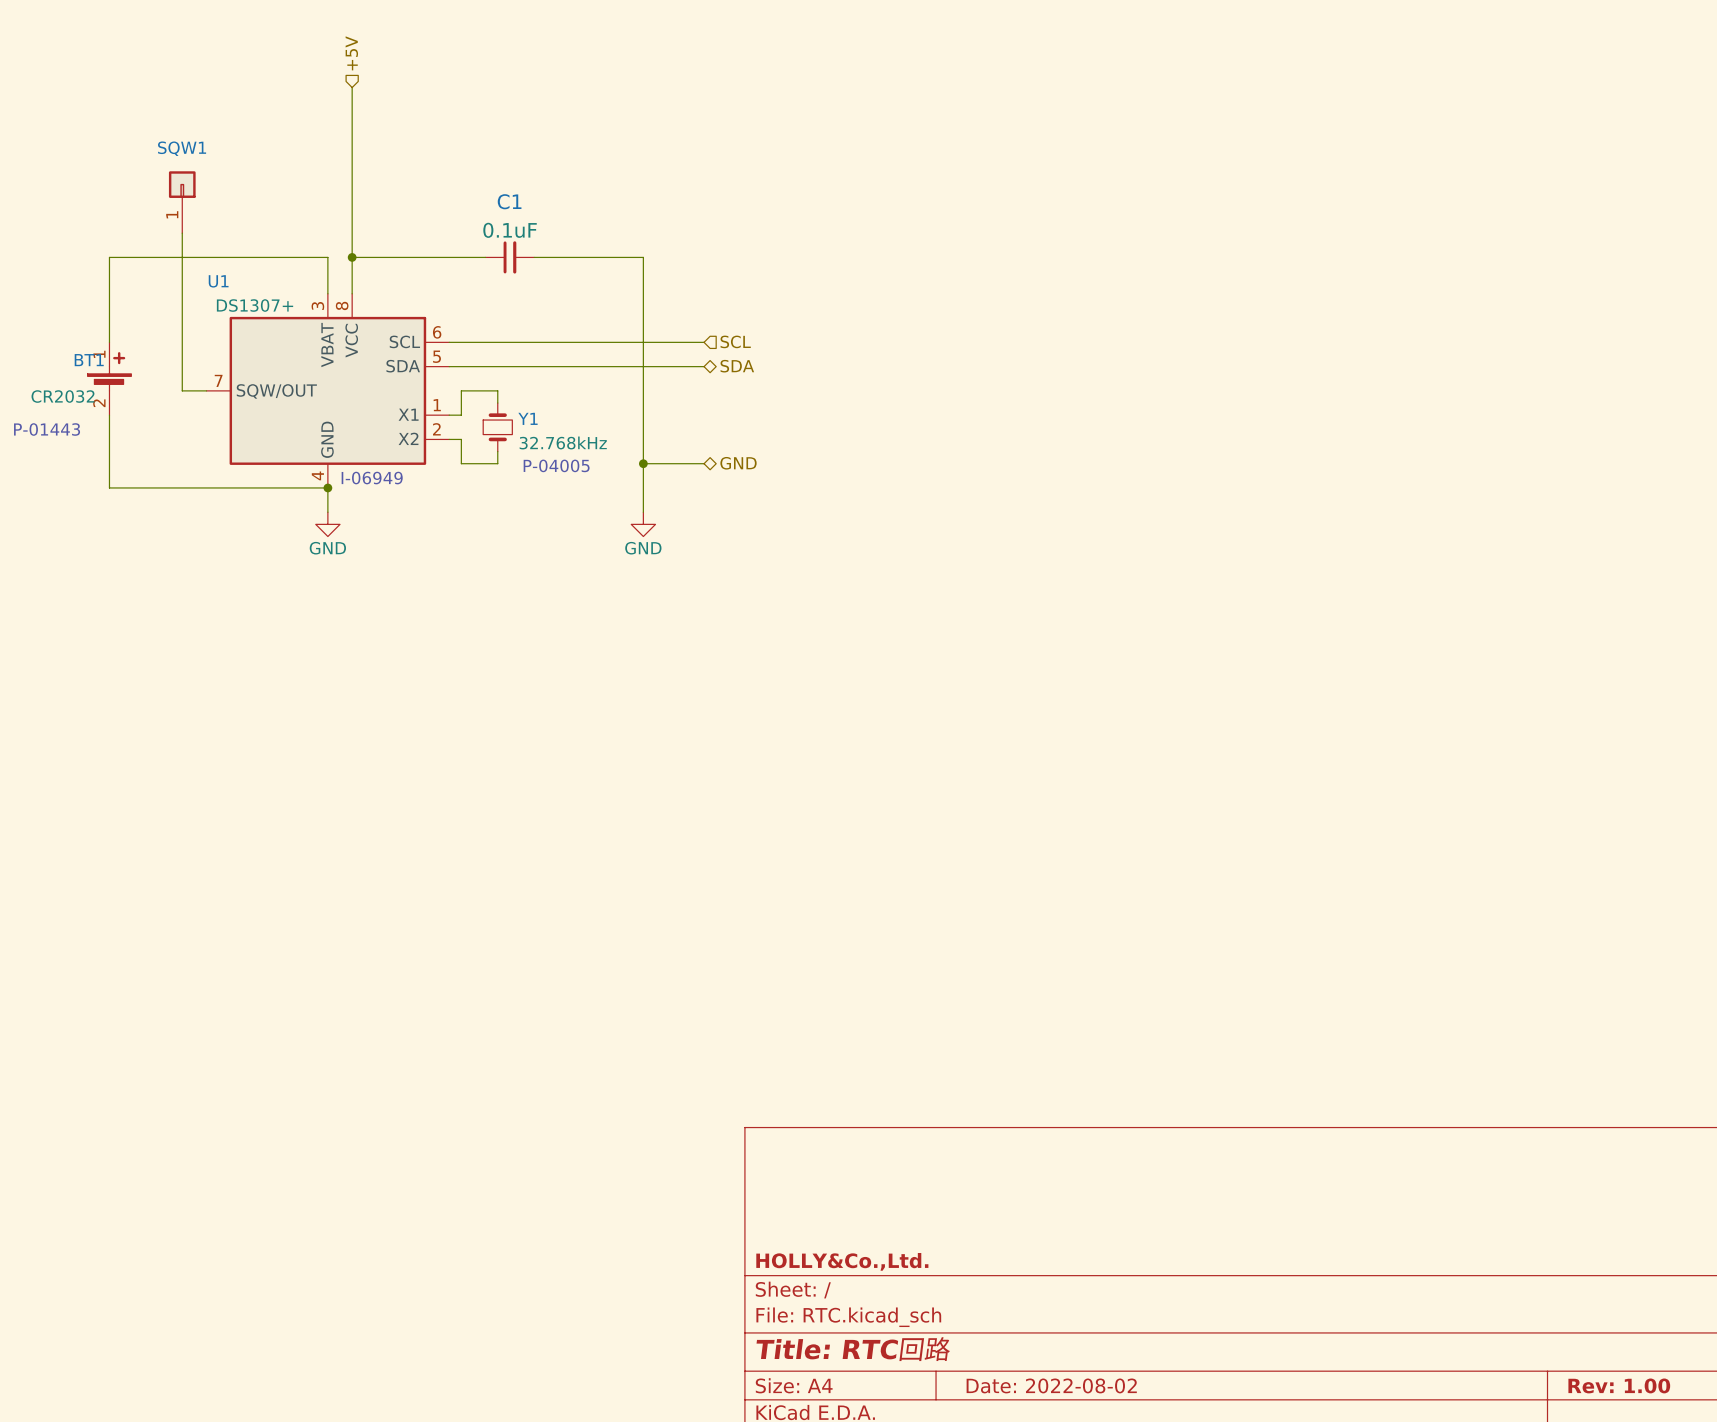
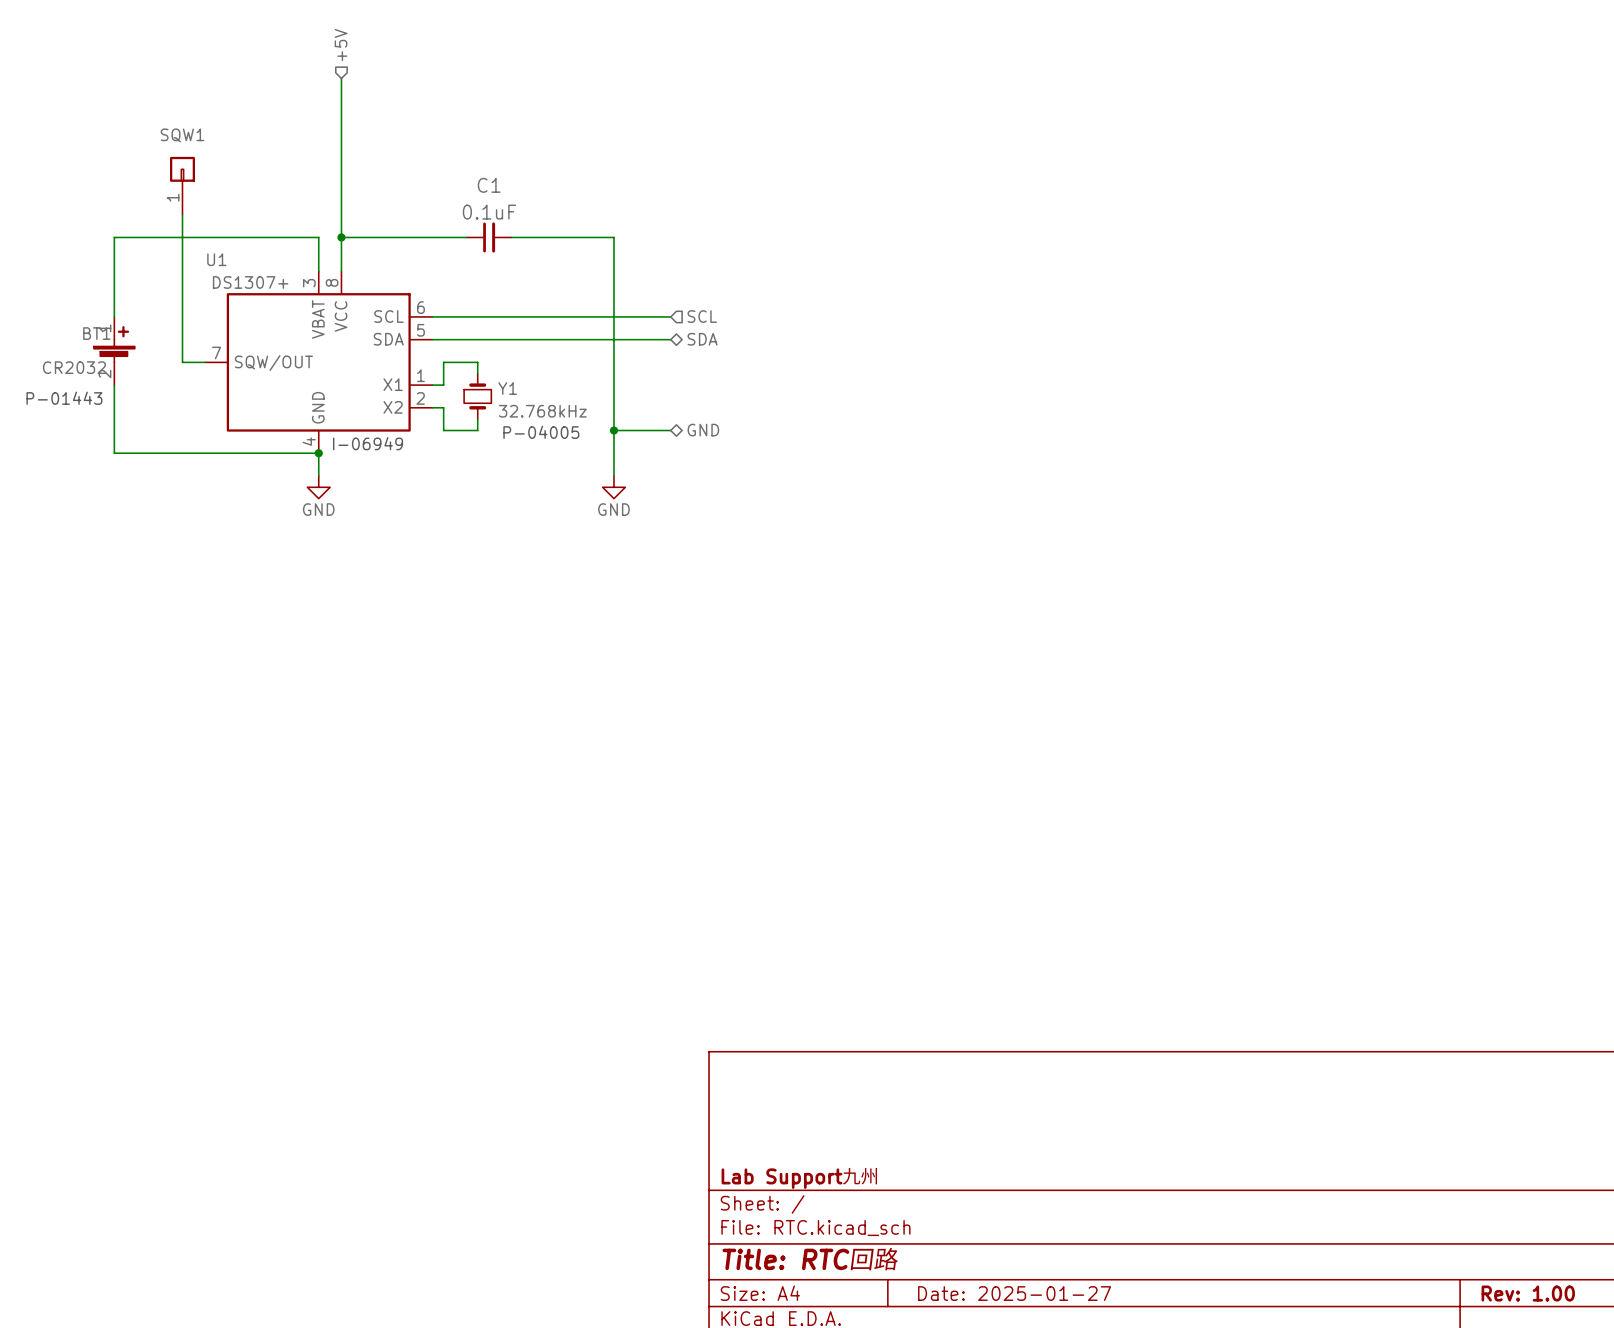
title block: HOLLY&Co.,Ltd. (842, 1261) -> Lab Support九州 (799, 1177)
title block: Date: 2022-08-02 (1051, 1385) -> Date: 2025-01-27 (1014, 1293)

